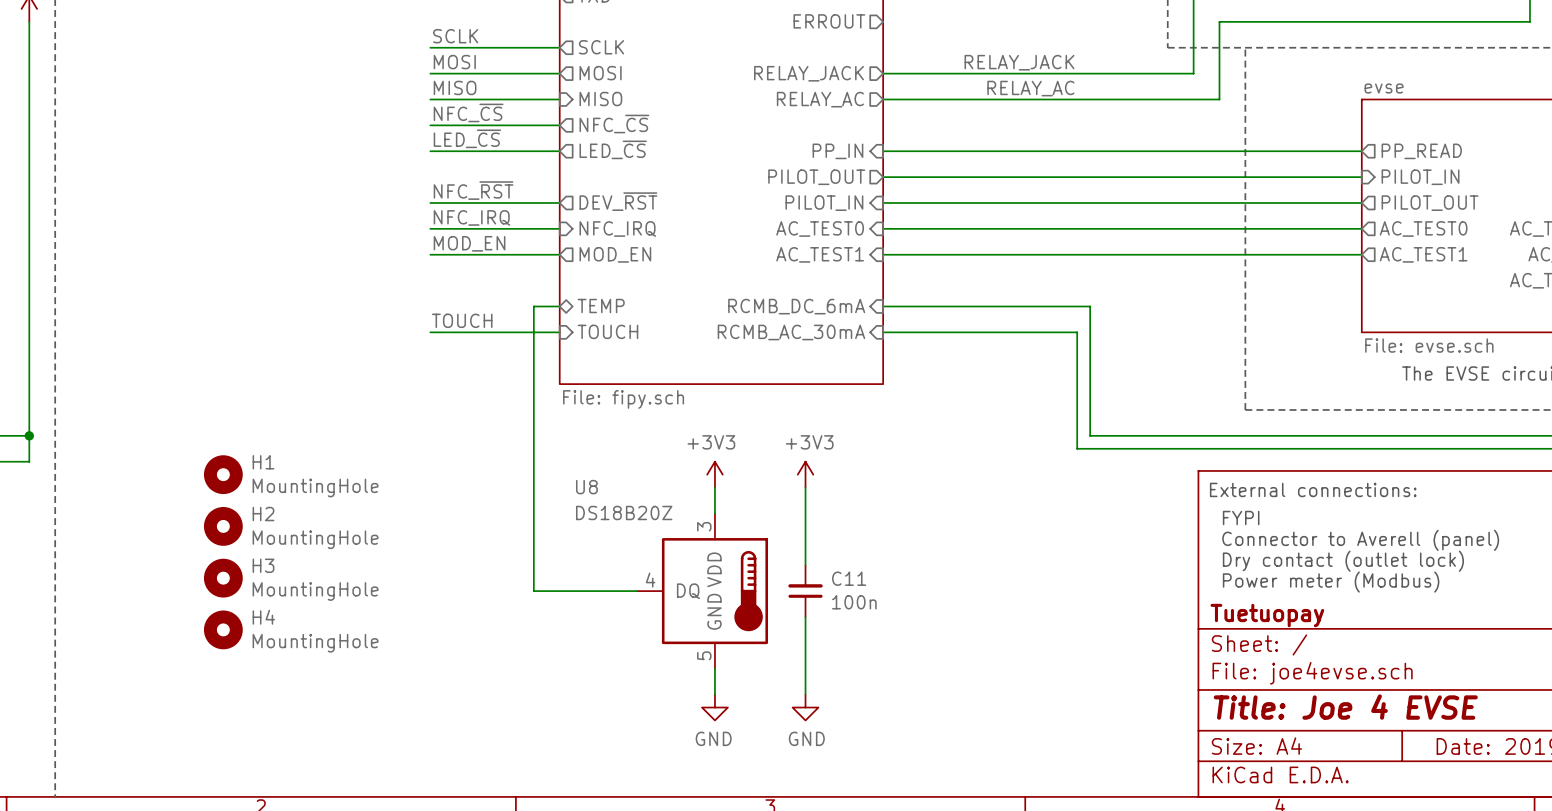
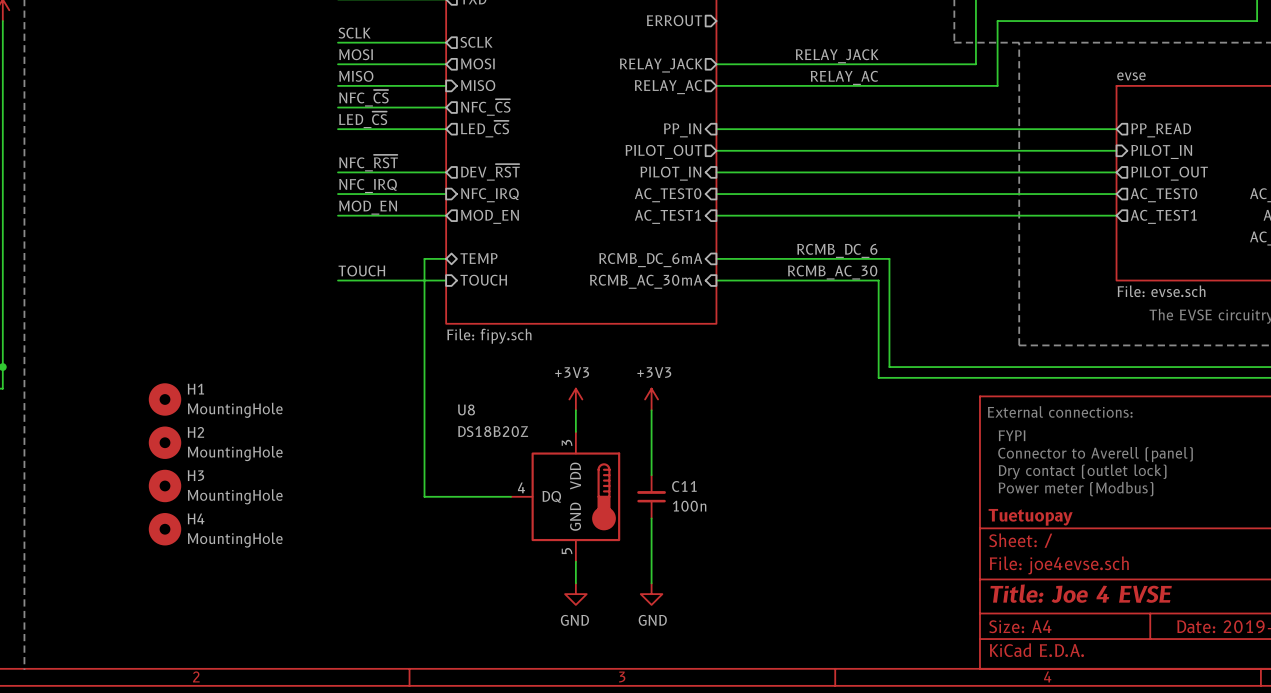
label: none -> RCMB_DC_6 (837, 250)
label: none -> RCMB_AC_30 (832, 272)

